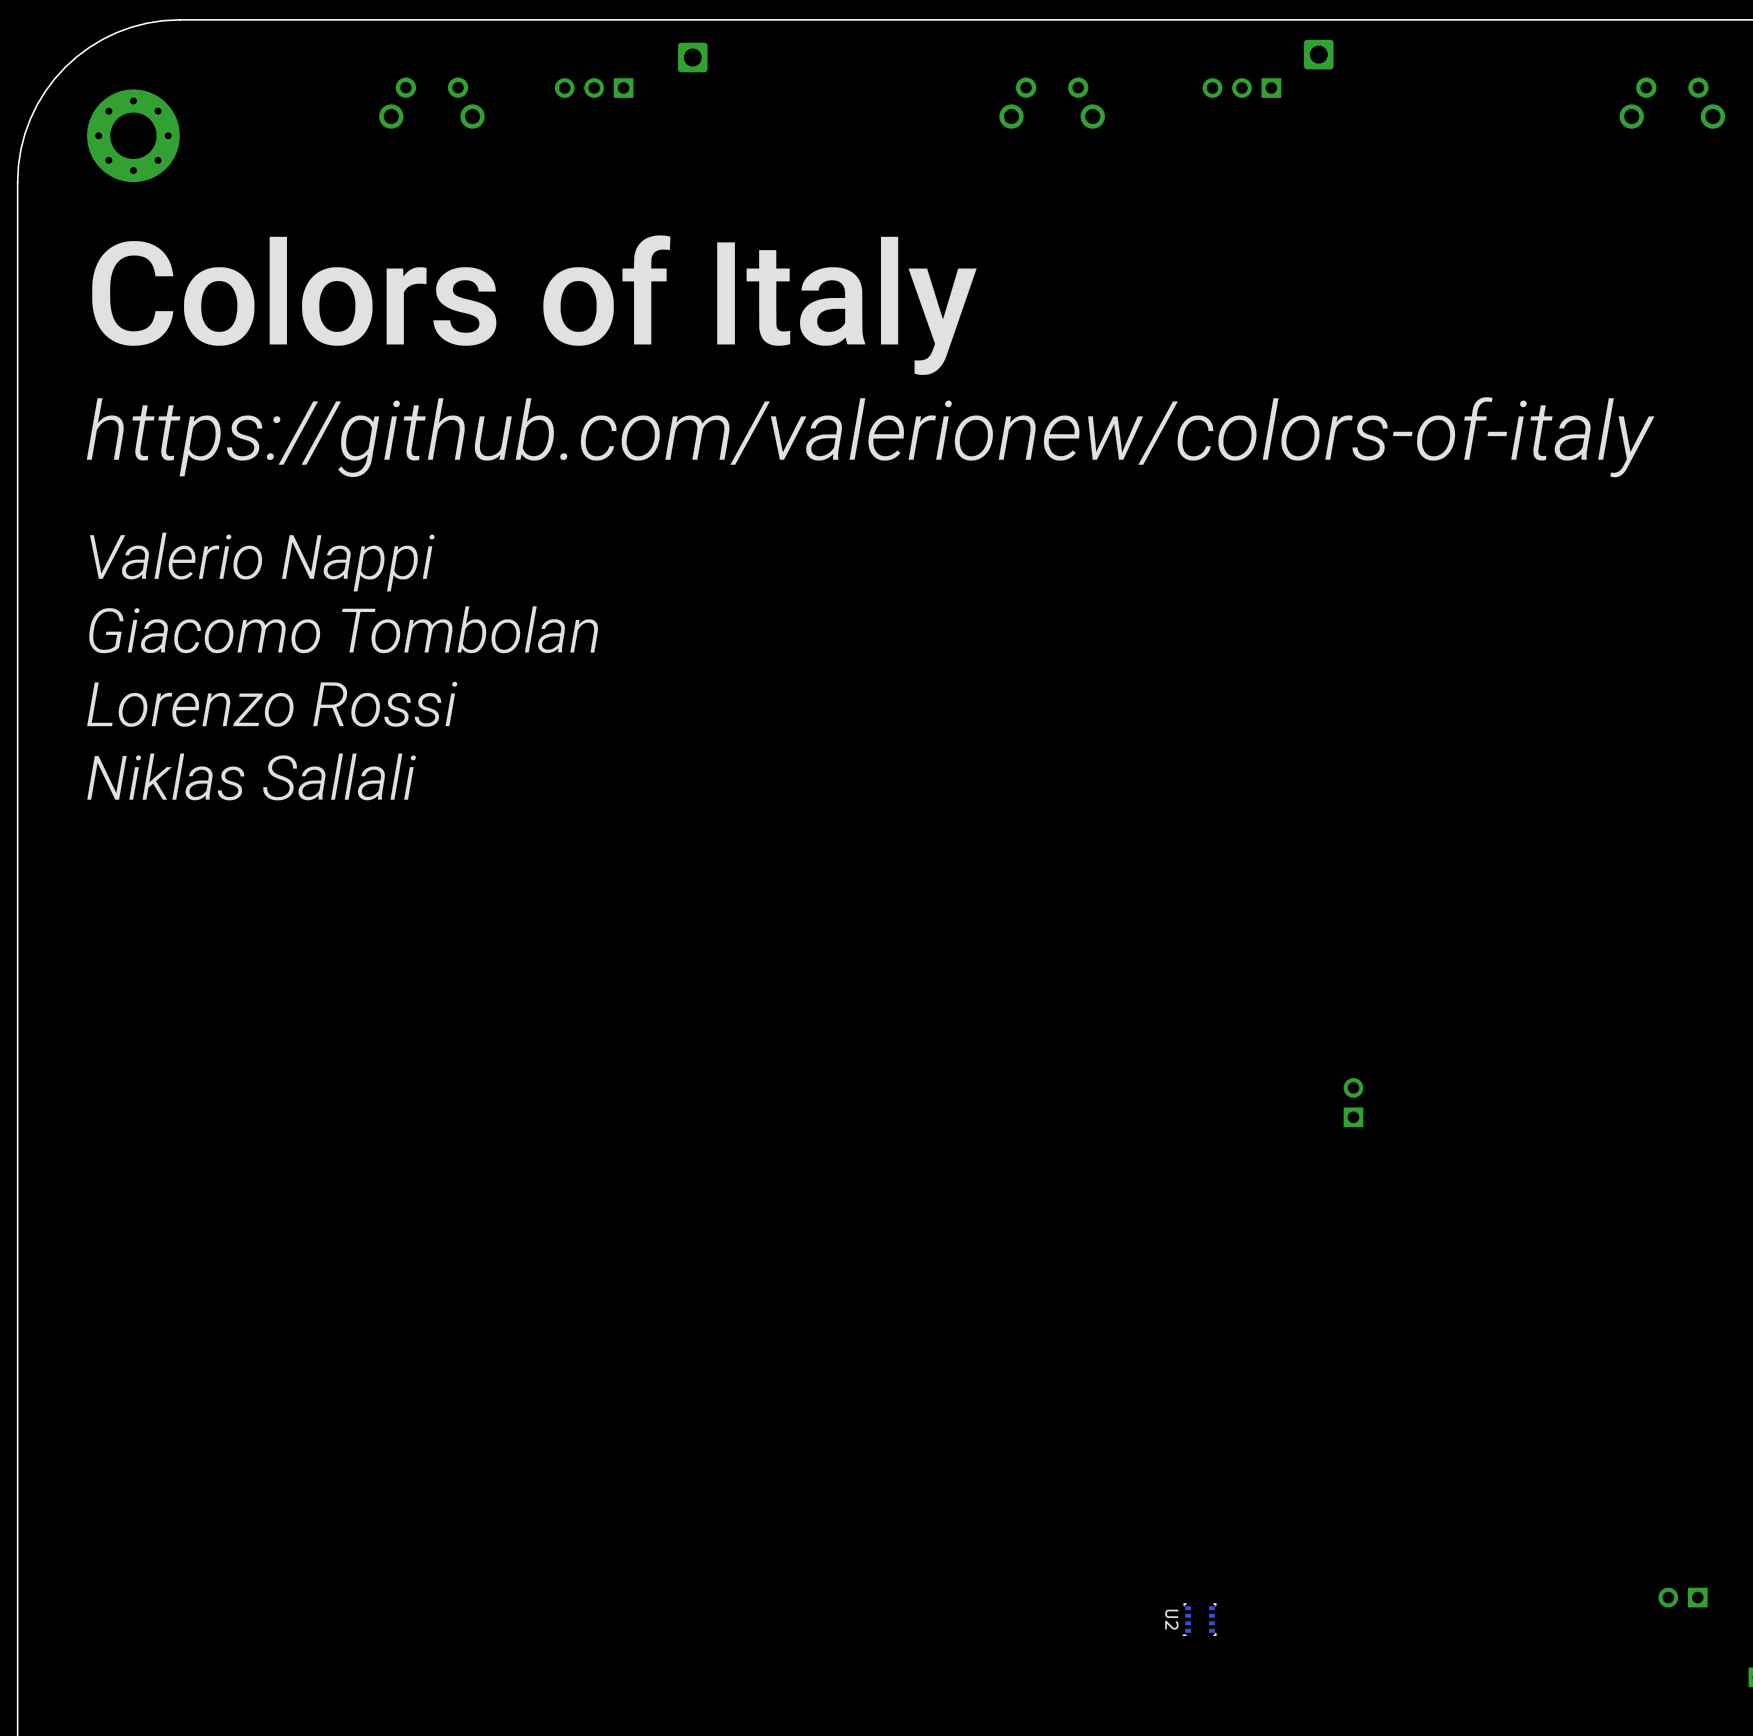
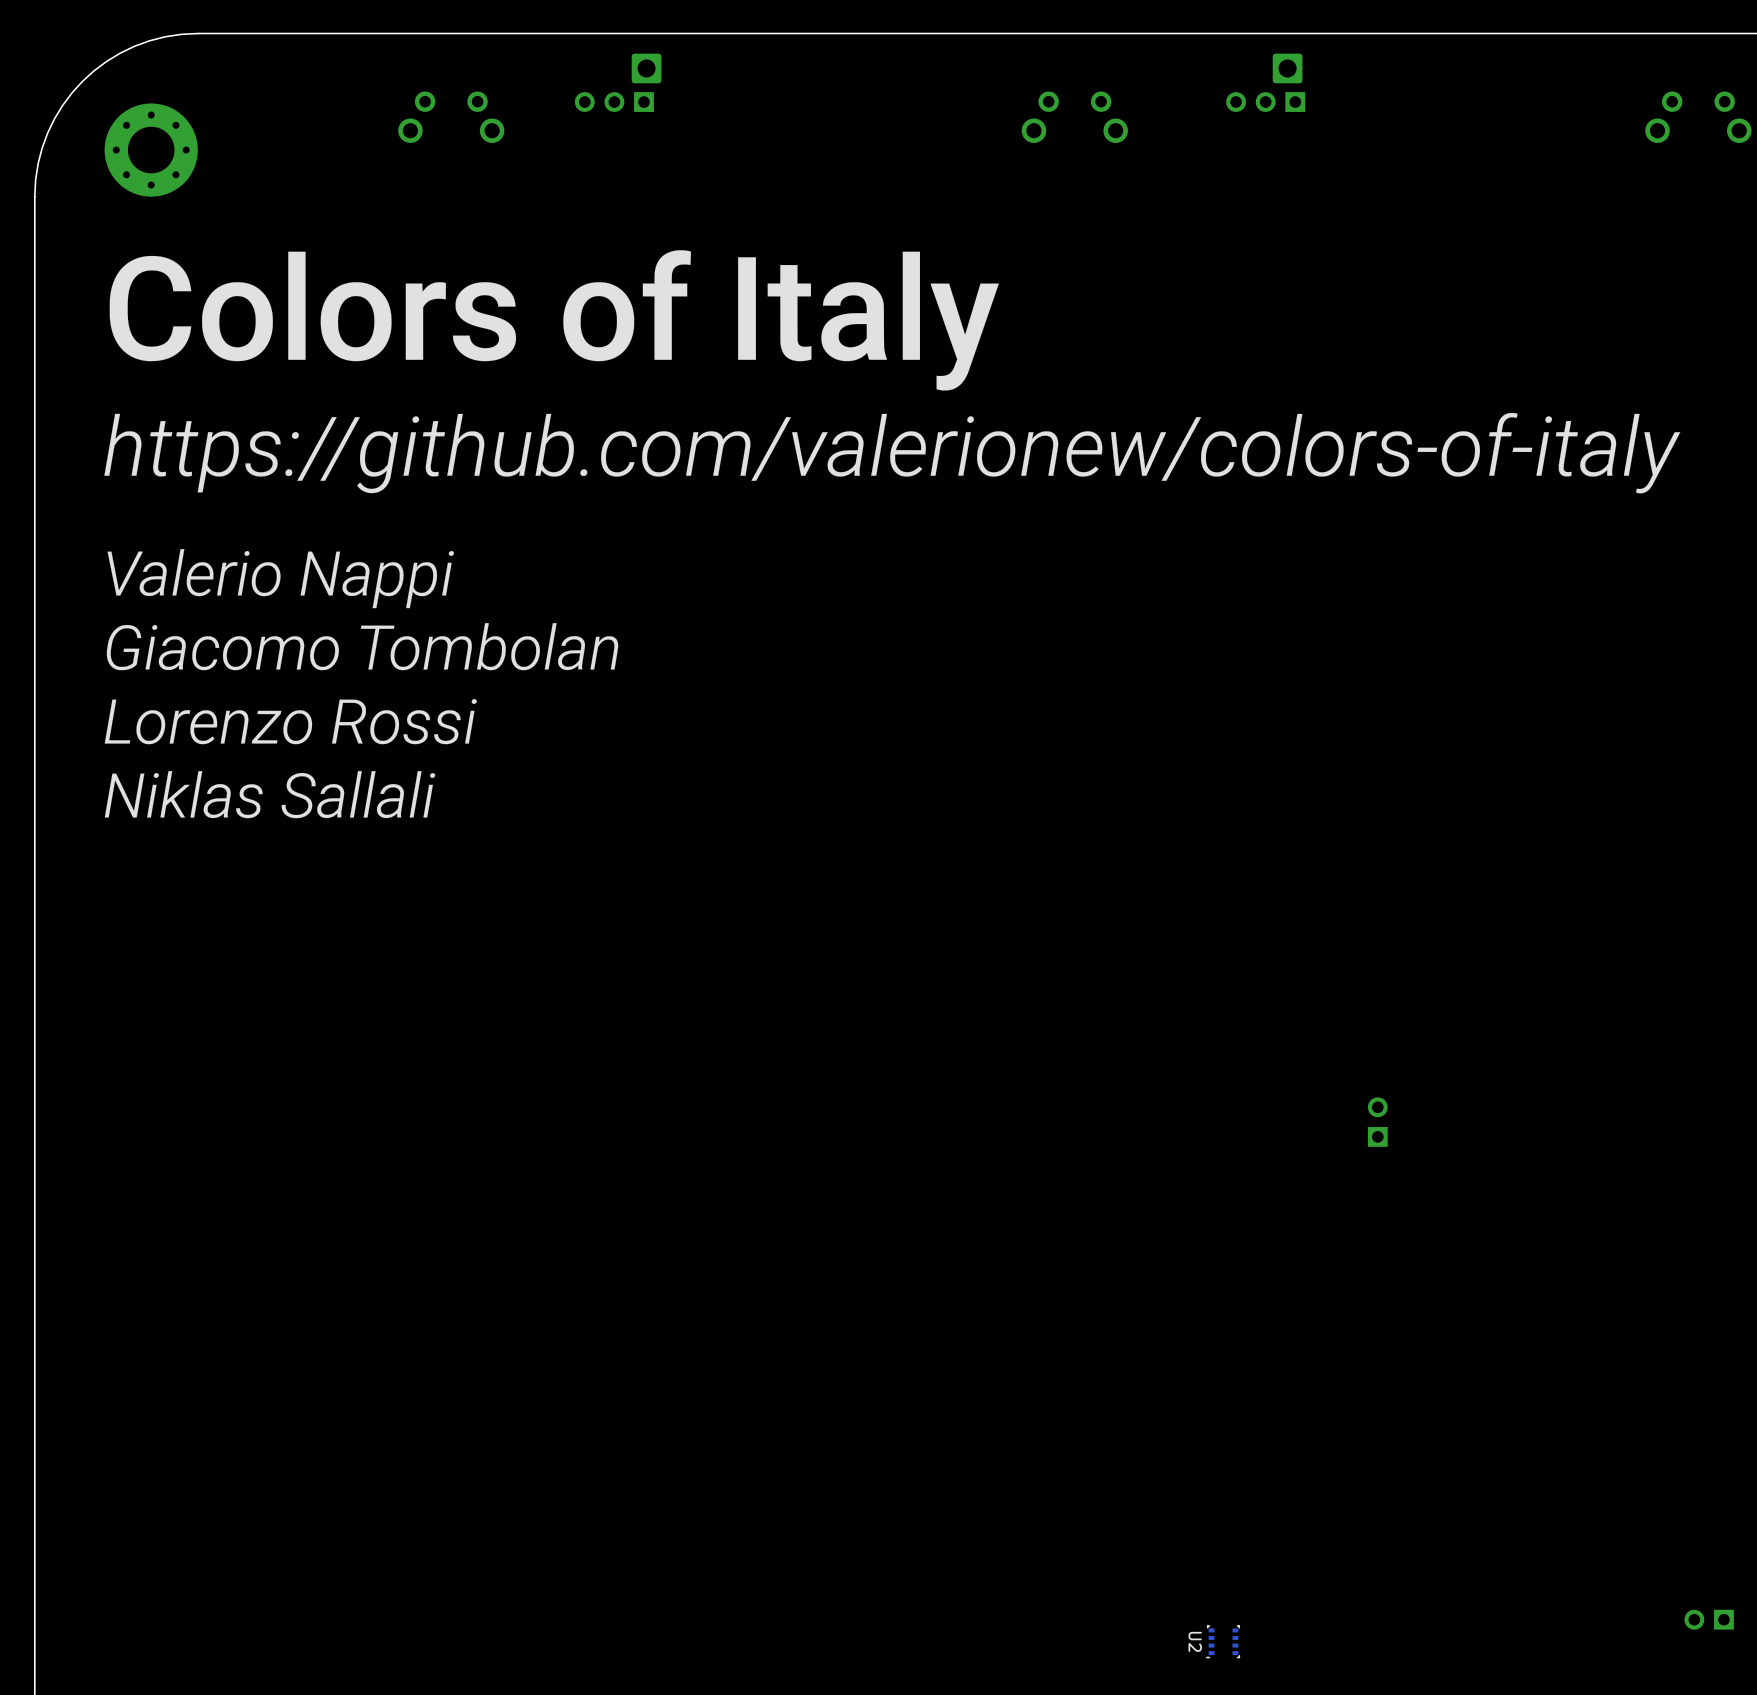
part position: (1318, 54) -> (1287, 68)
part position: (692, 57) -> (646, 68)

